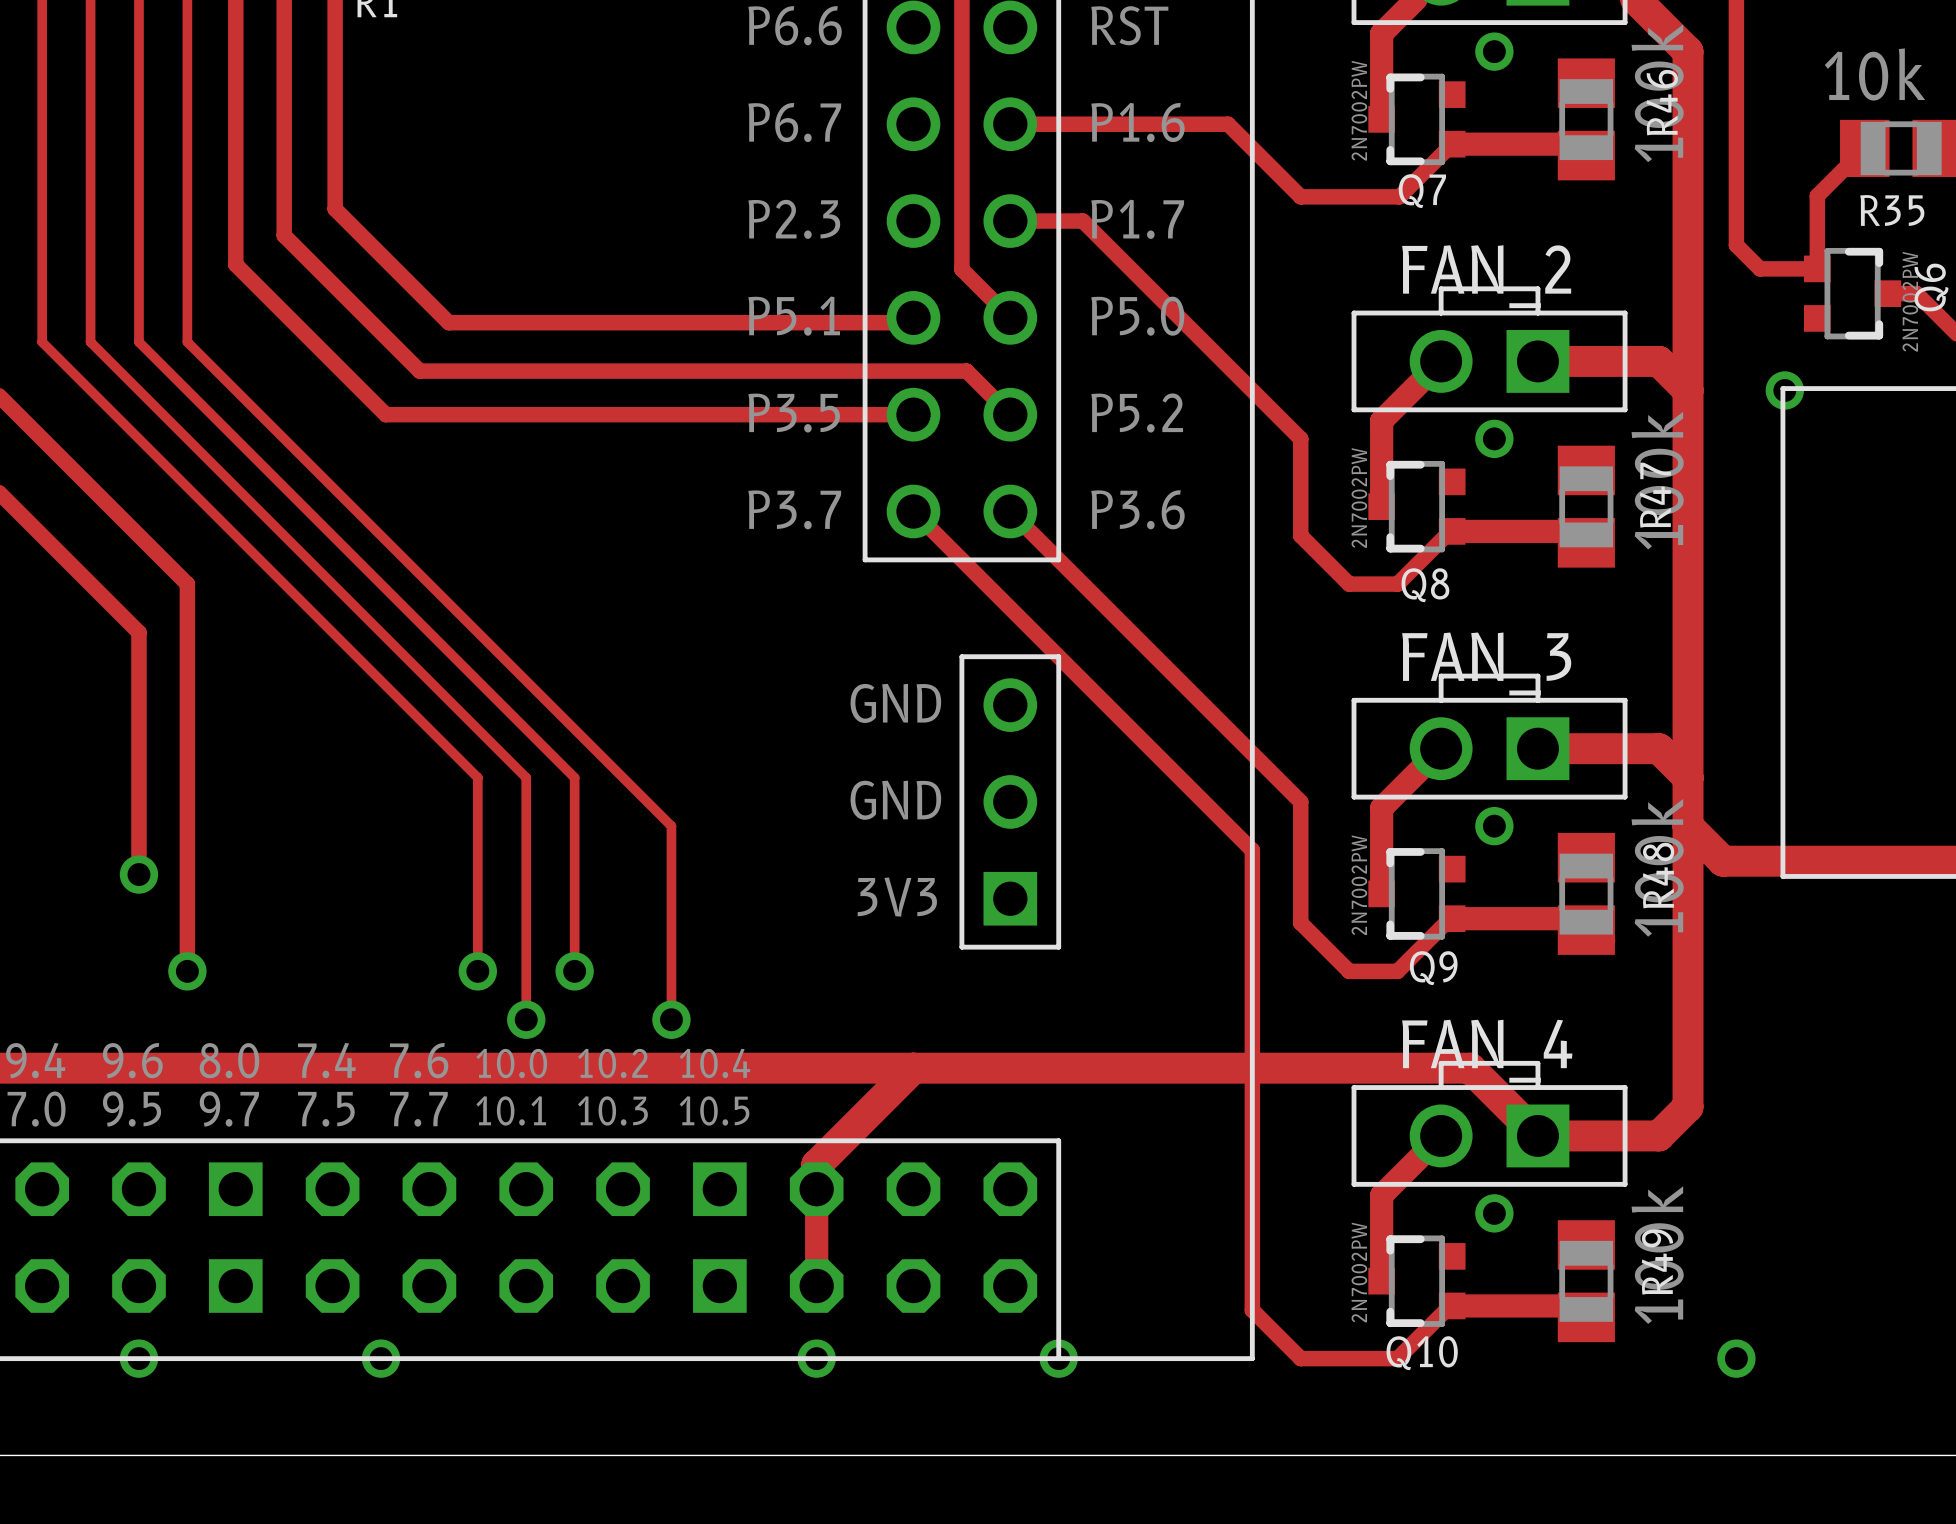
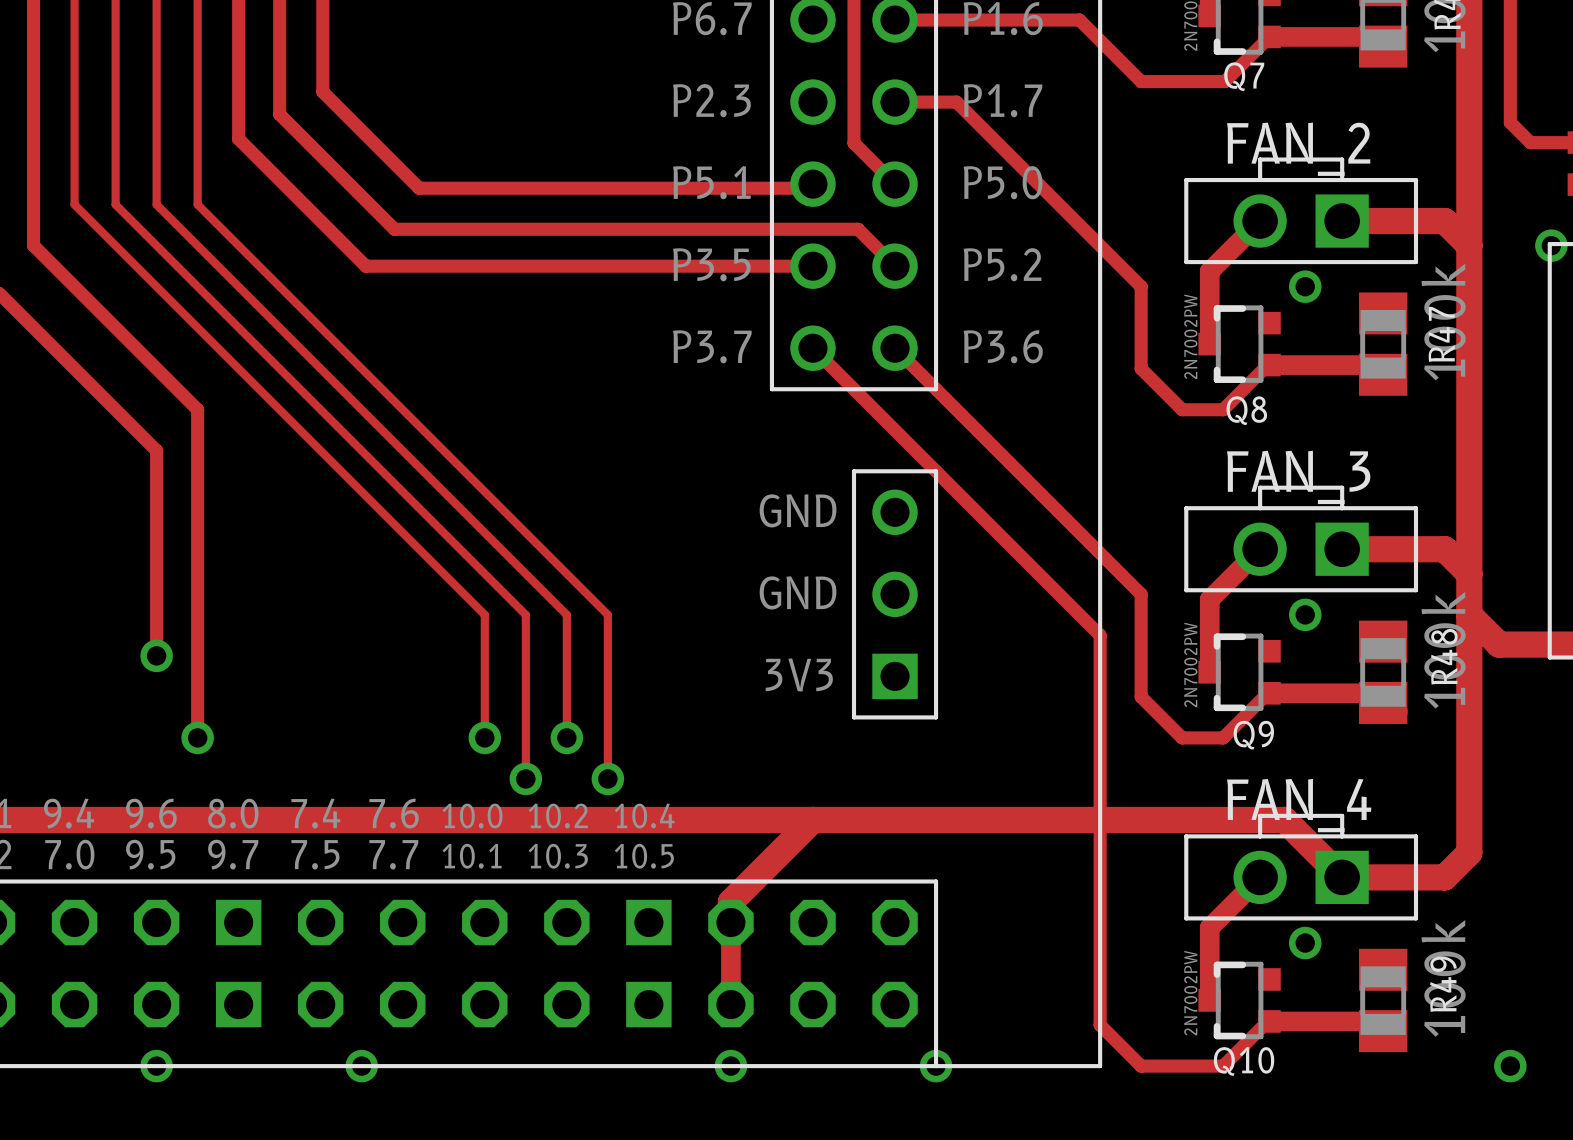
track: (477, 777) (477, 971) -> none
track: (526, 777) (526, 826) -> (443, 573) (484, 614)
track: (574, 777) (574, 826) -> (484, 573) (525, 614)
track: none -> (525, 573) (566, 614) (566, 737)
via: (477, 971) -> none
track: (526, 971) (526, 1019) -> (525, 737) (525, 778)
via: none -> (484, 737)
via: (574, 971) -> none
via: none -> (566, 737)
via: (526, 1019) -> none
via: none -> (525, 778)

